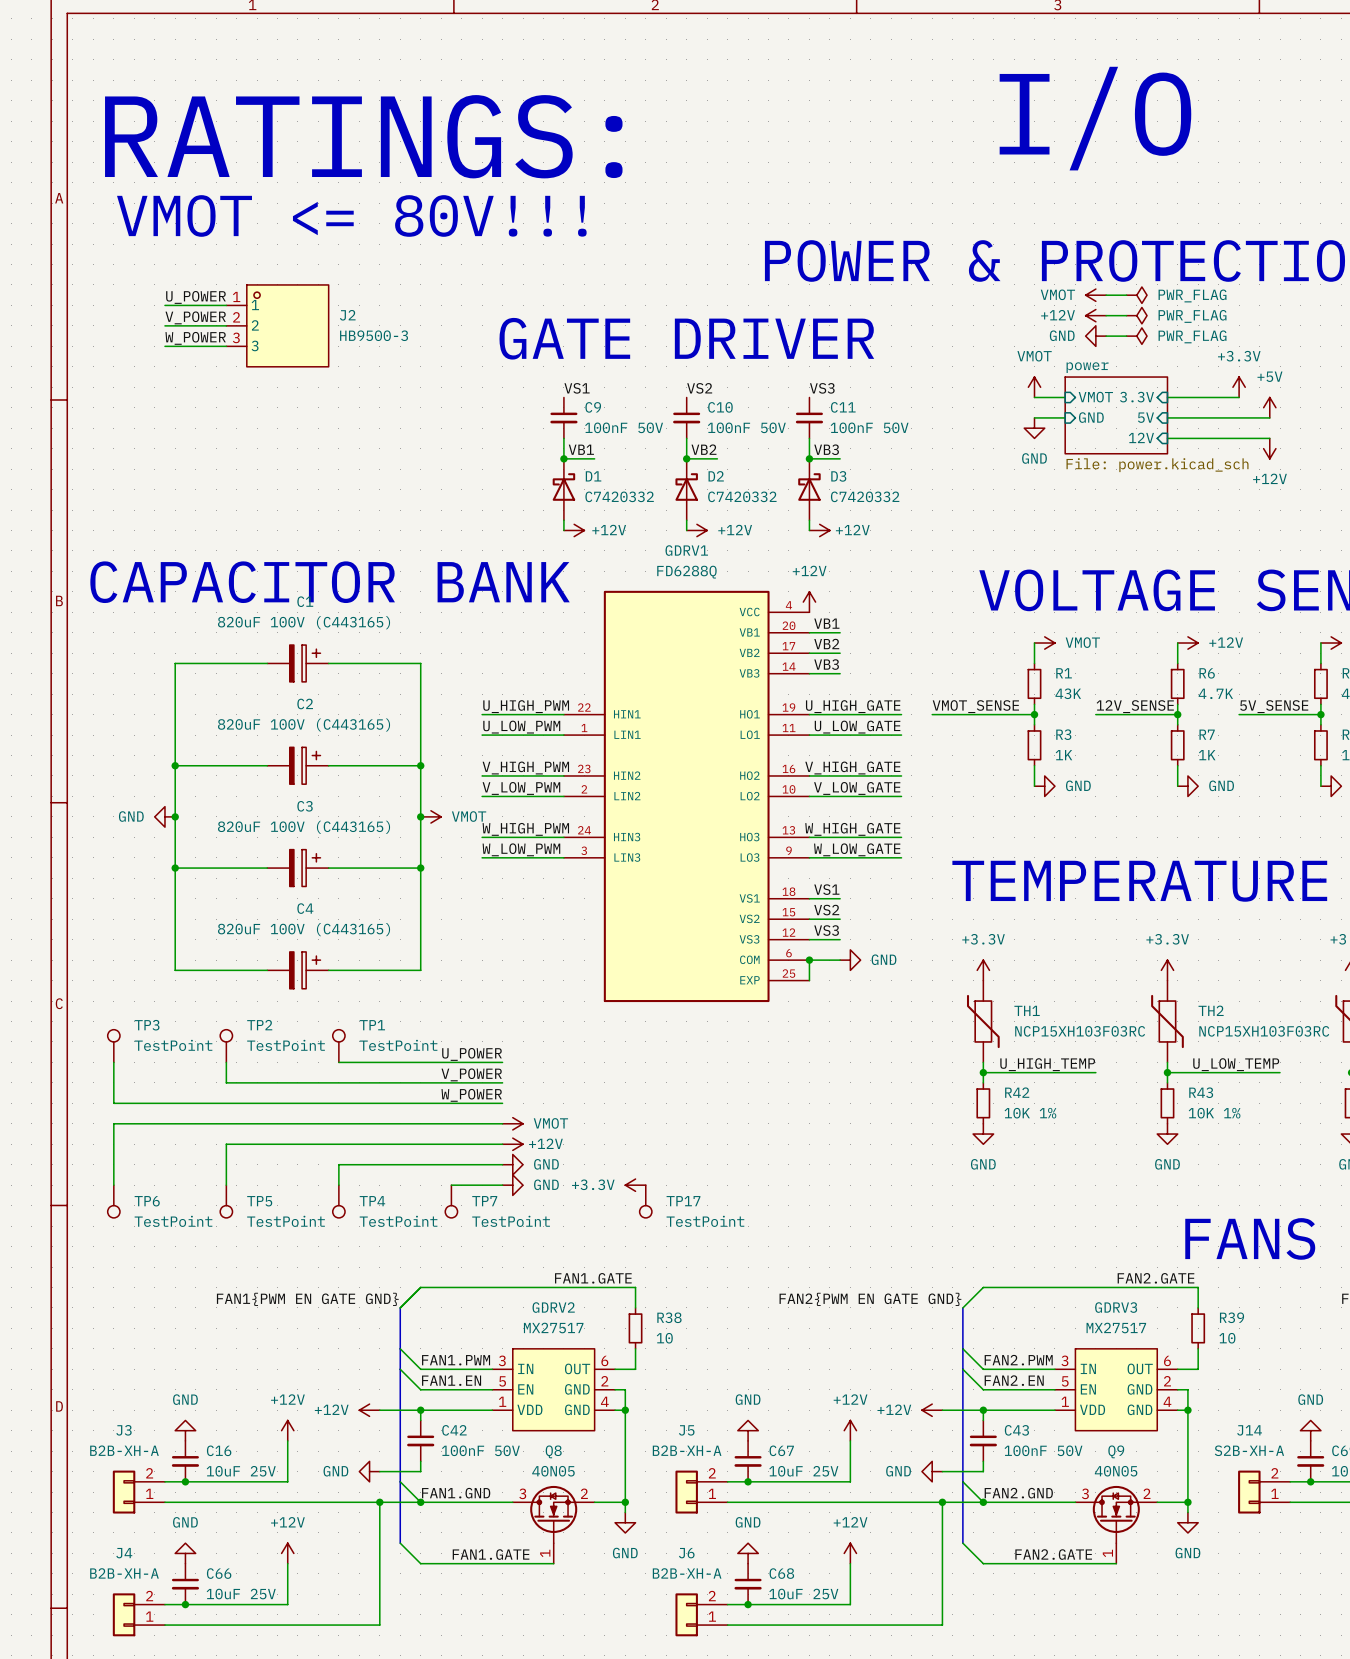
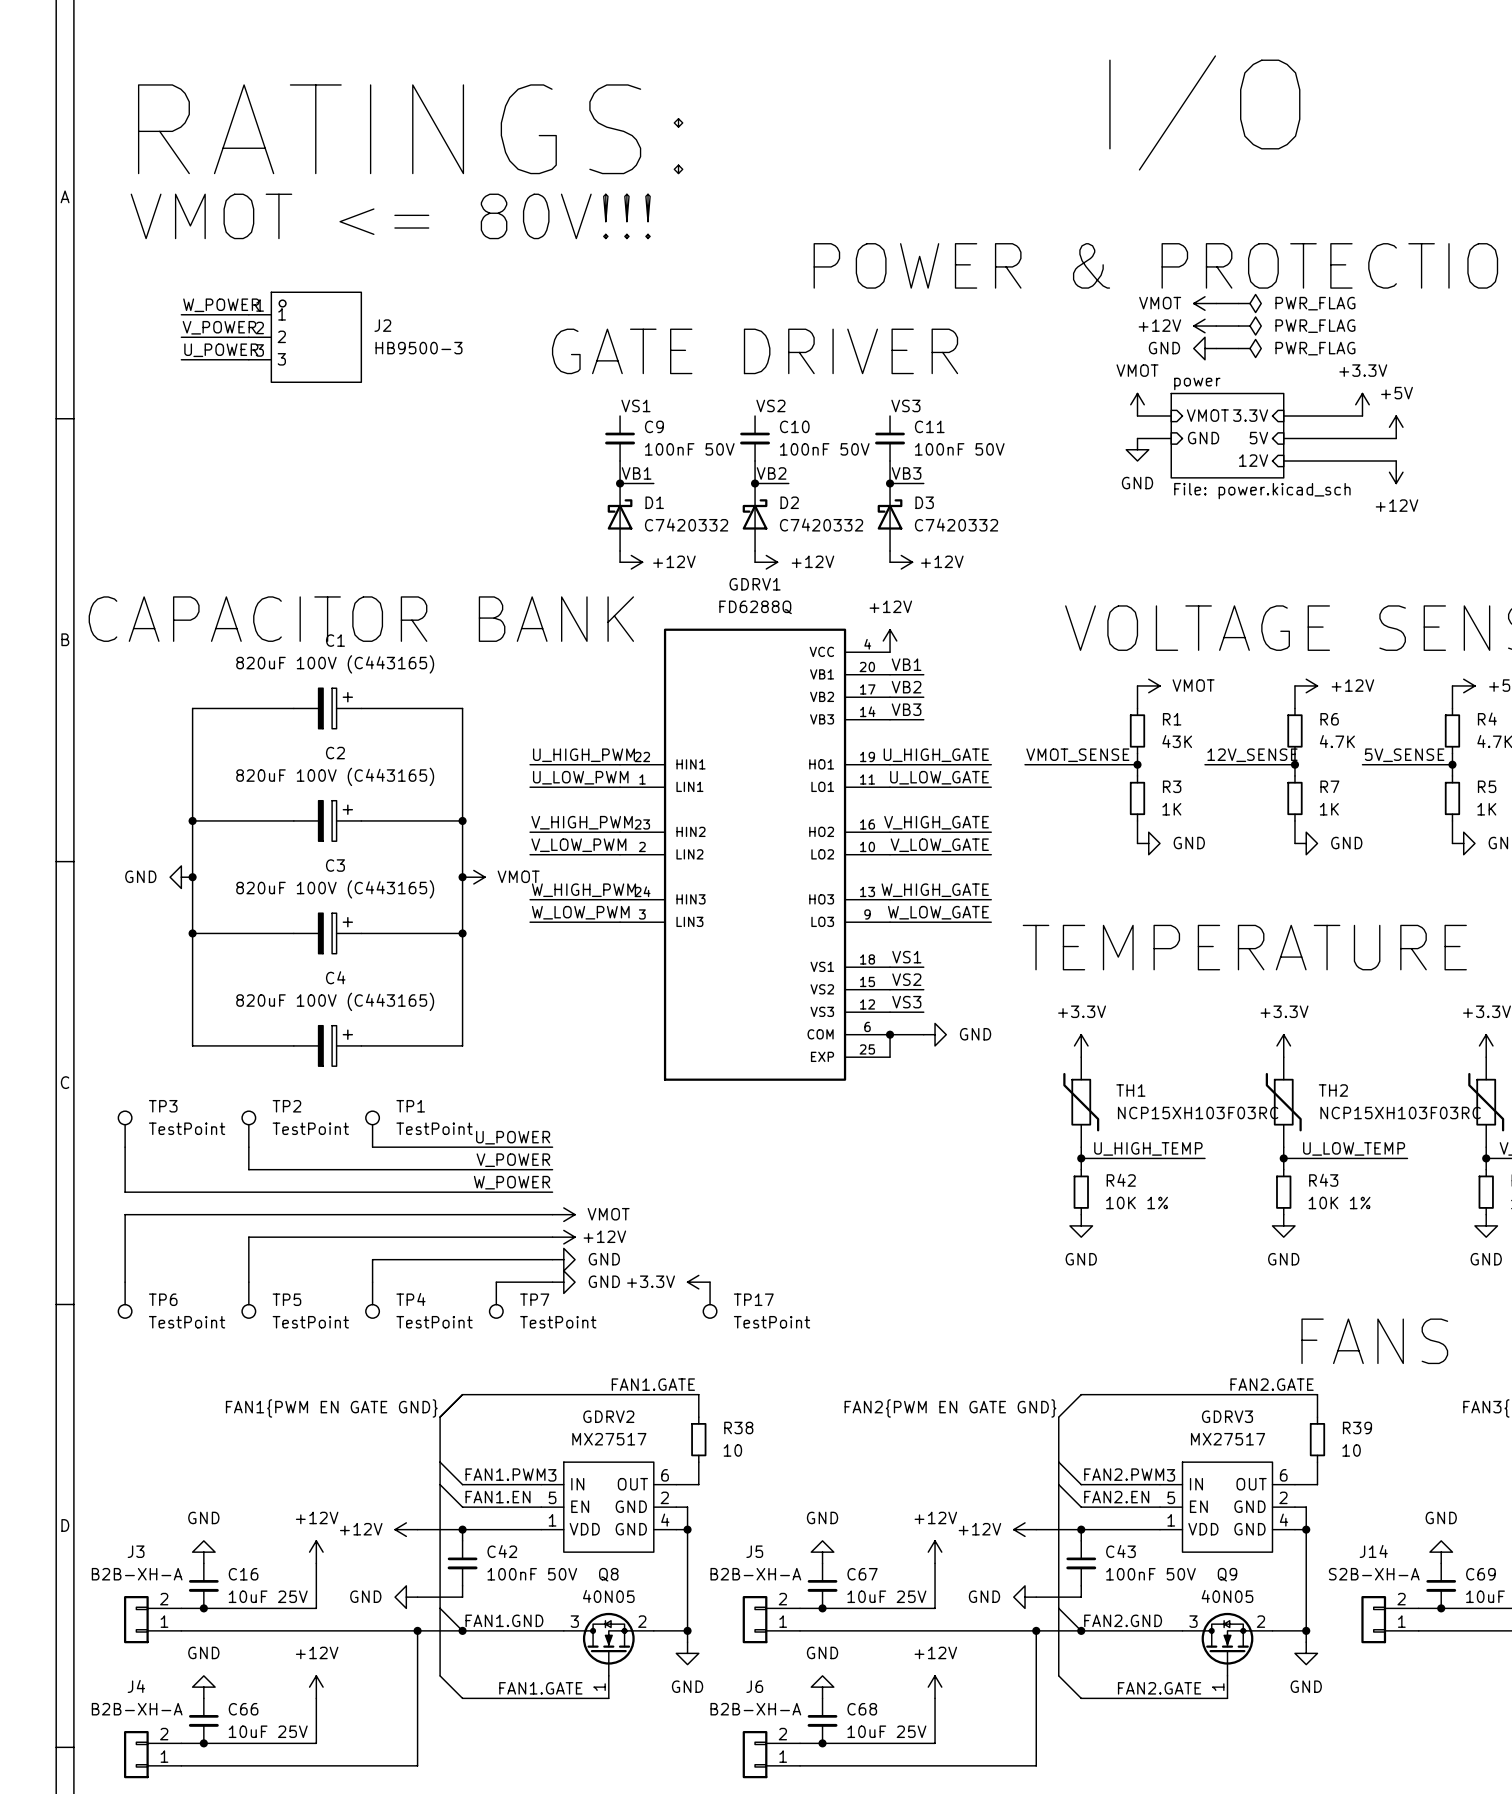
label: U_POWER (195, 297) -> W_POWER (221, 305)
label: W_POWER (195, 338) -> U_POWER (221, 350)

